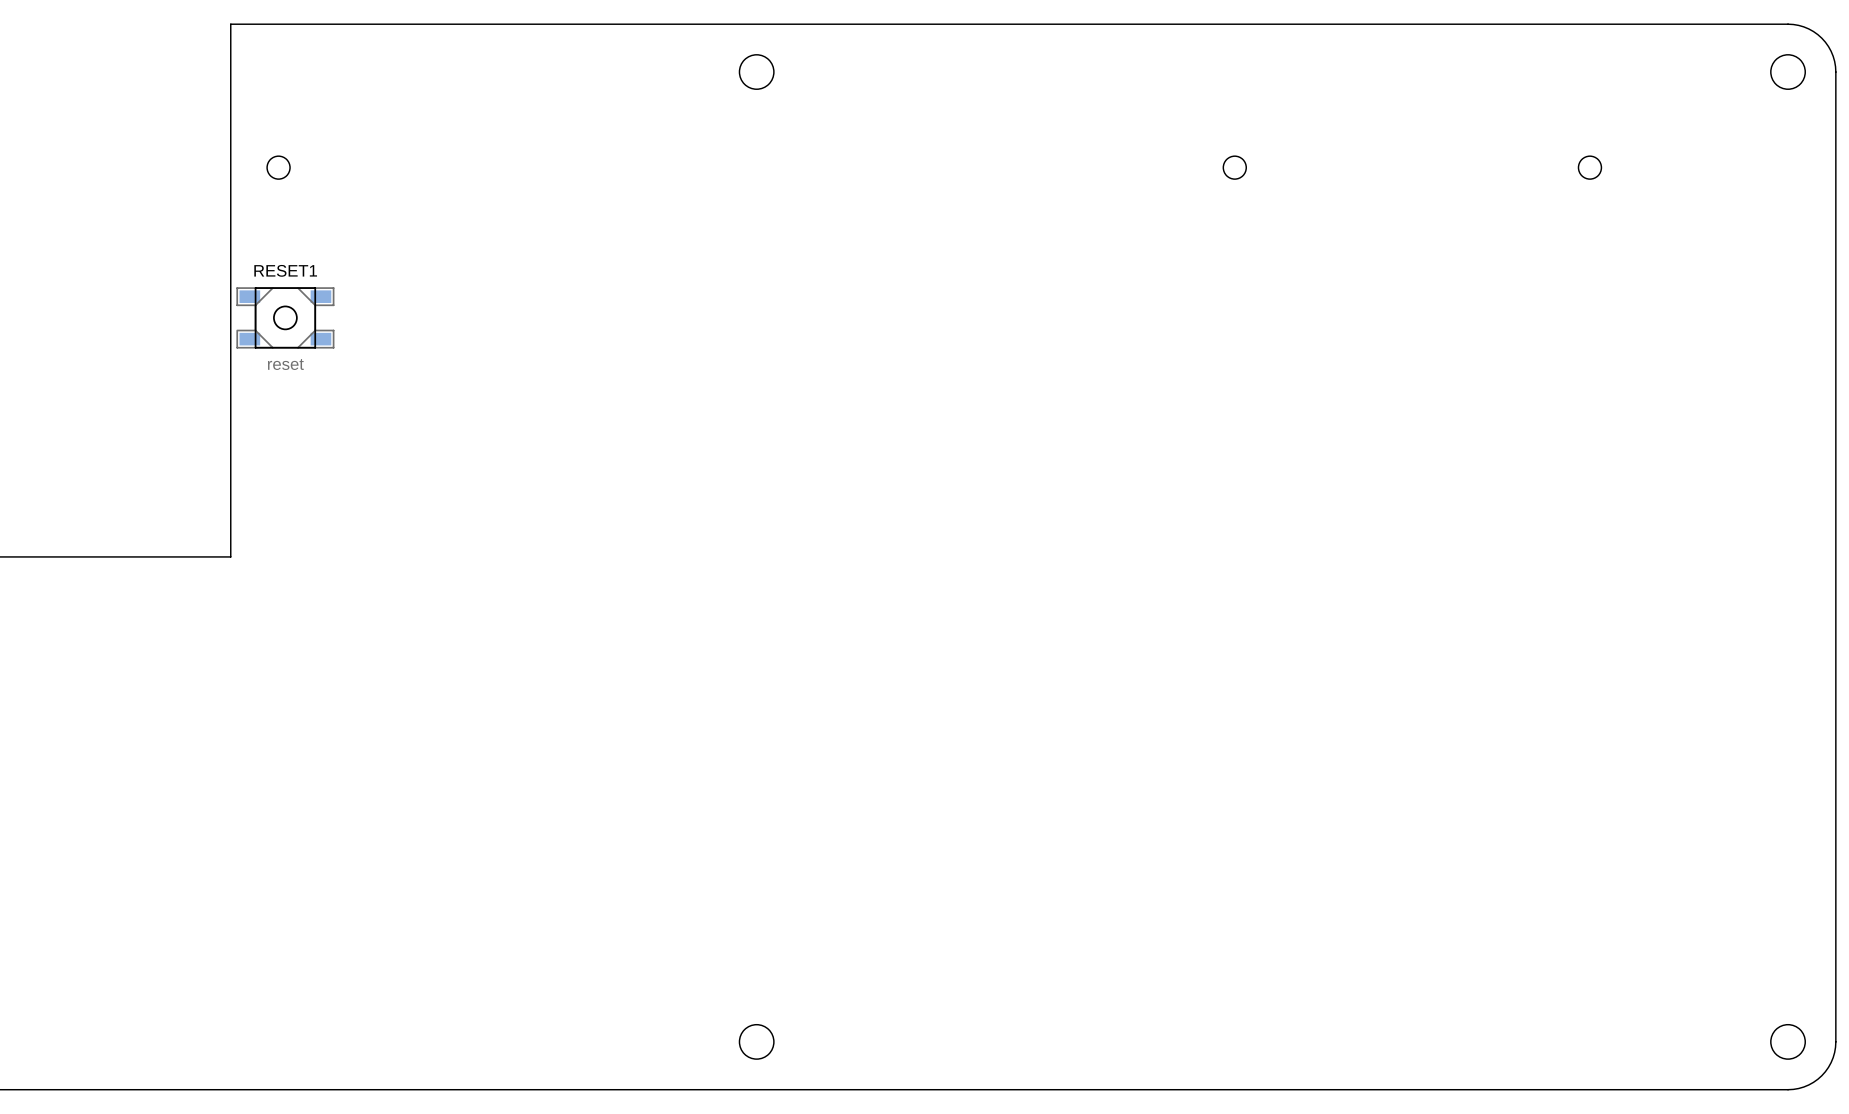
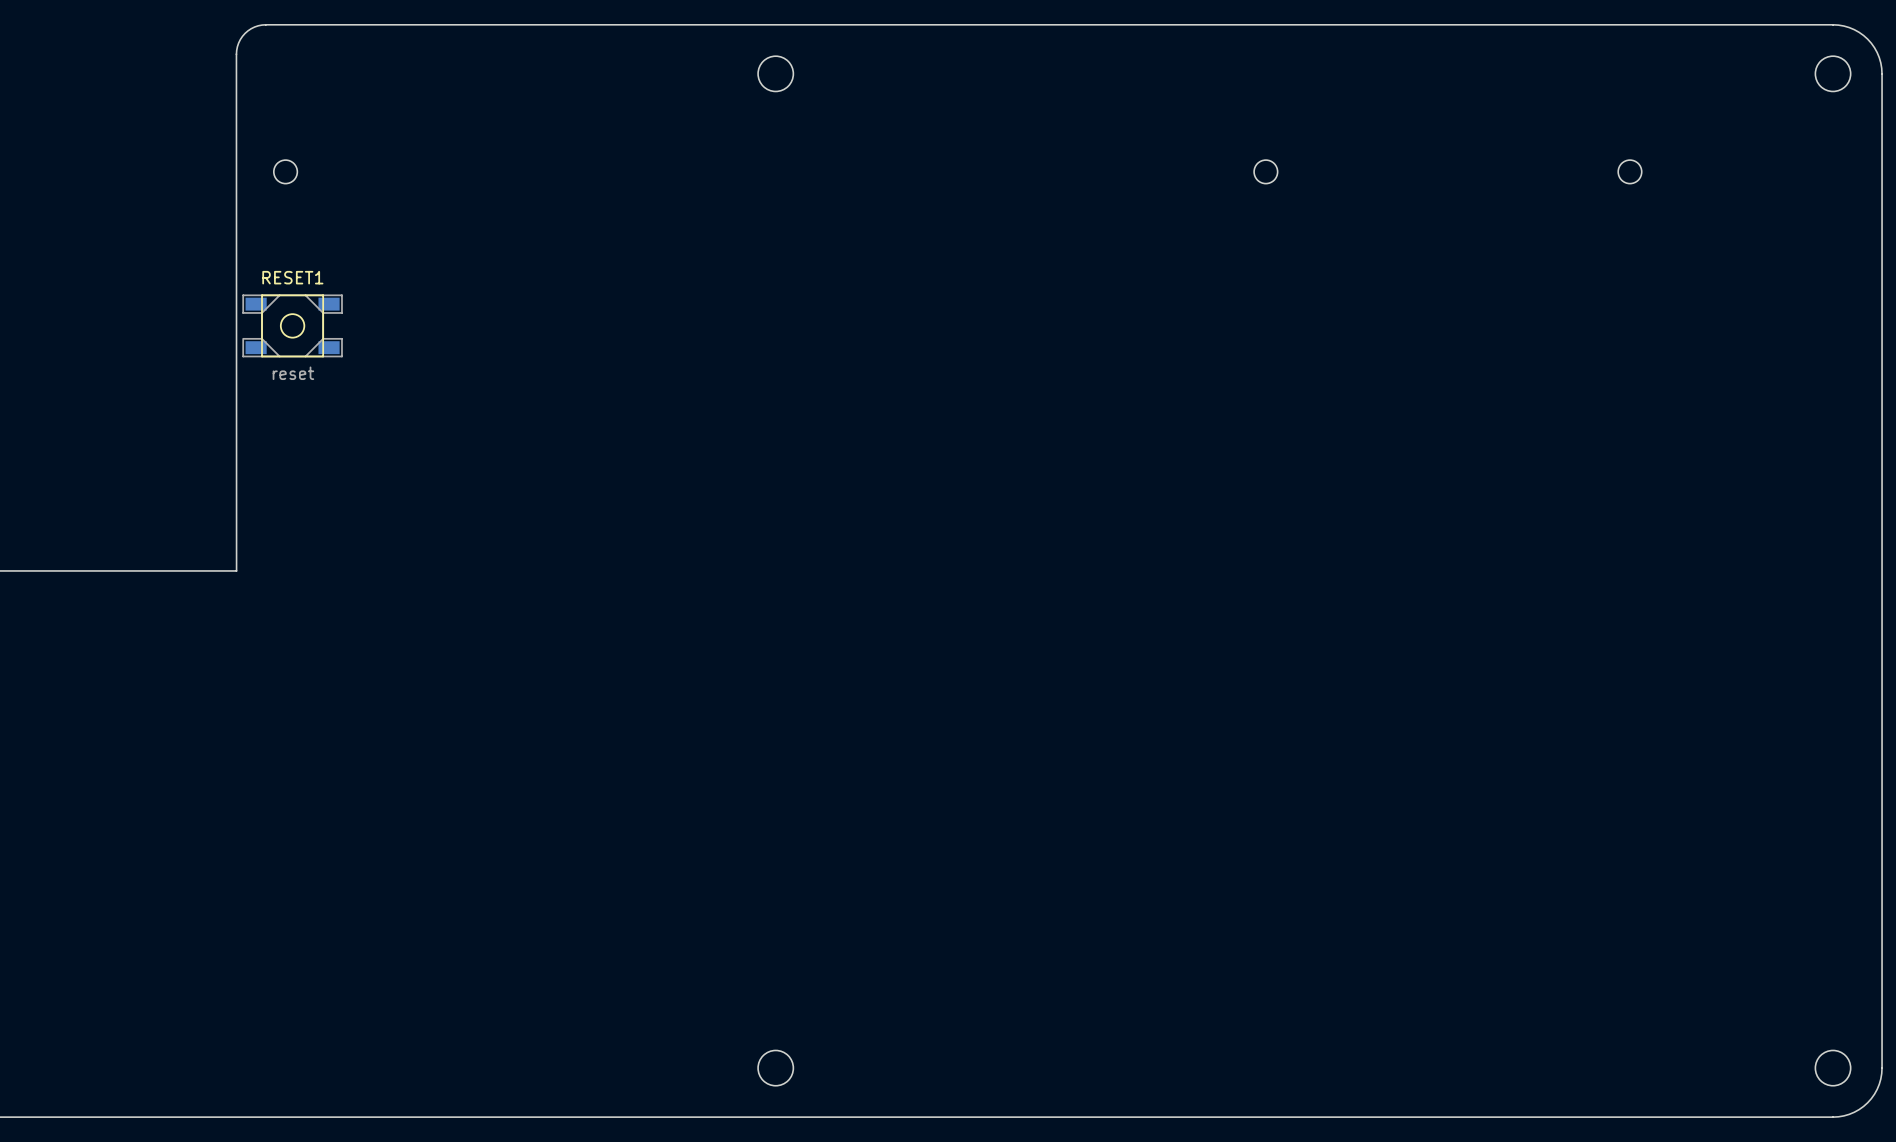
board edge: none -> (265, 24) (254, 27) (245, 33) (238, 42) (236, 54) (236, 570)
board edge: (1788, 24) (230, 24) (230, 556) -> (1833, 24) (265, 24)

